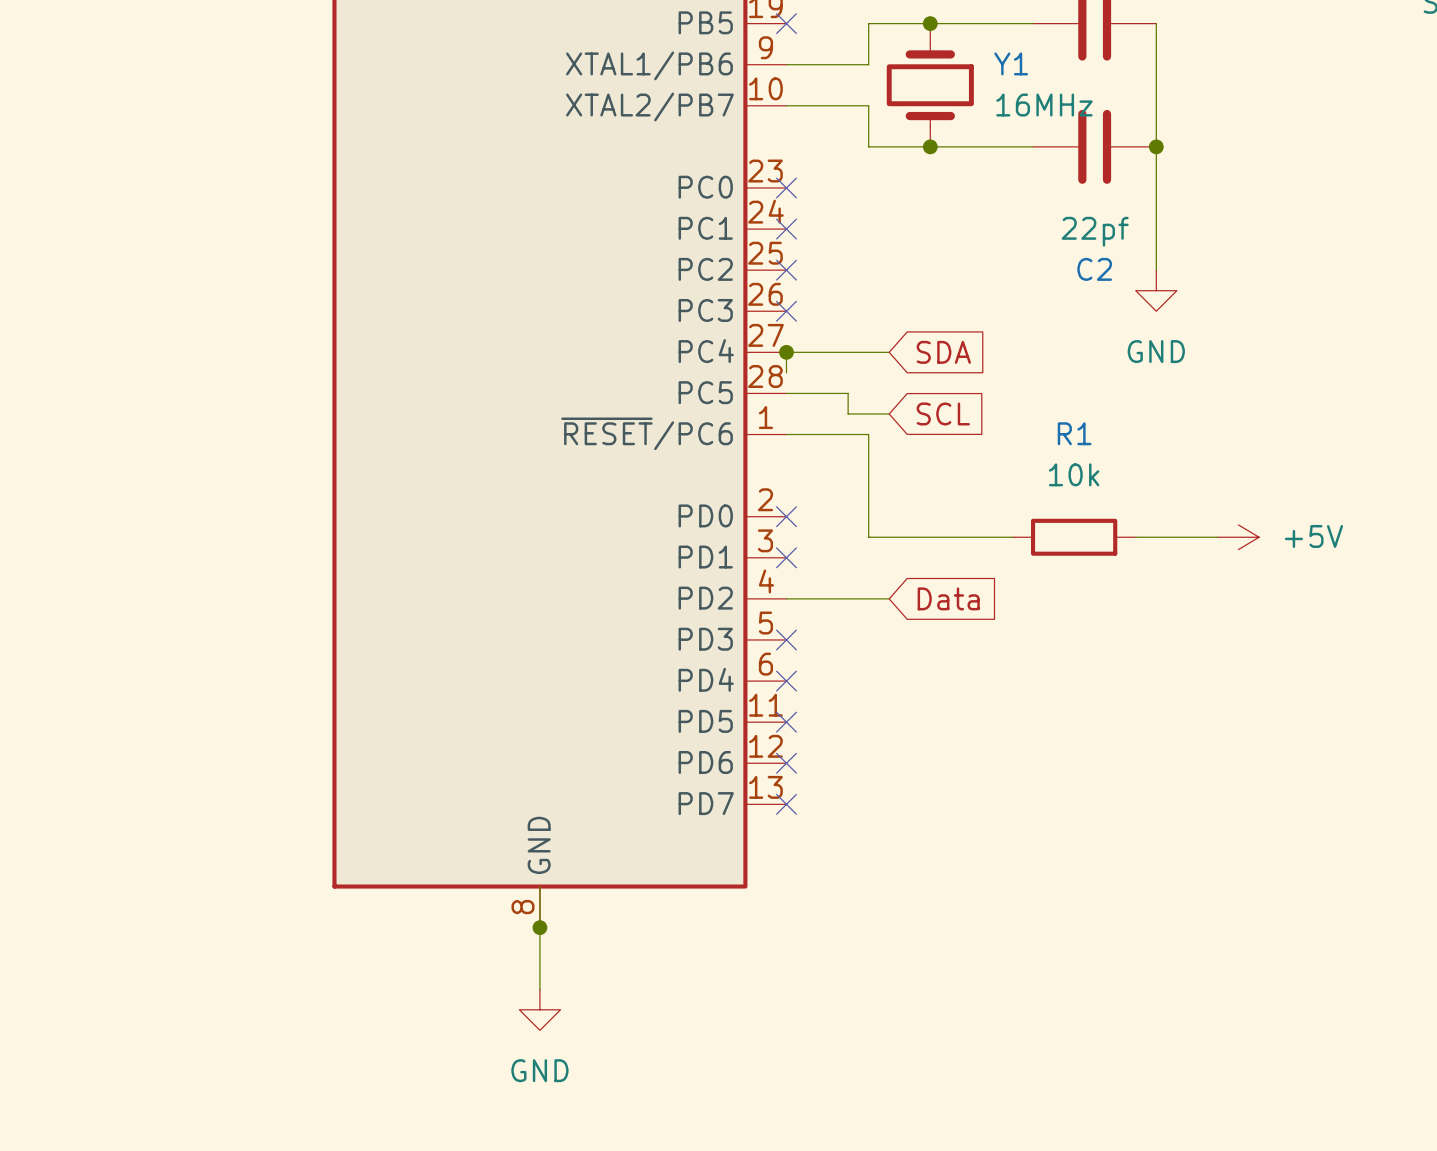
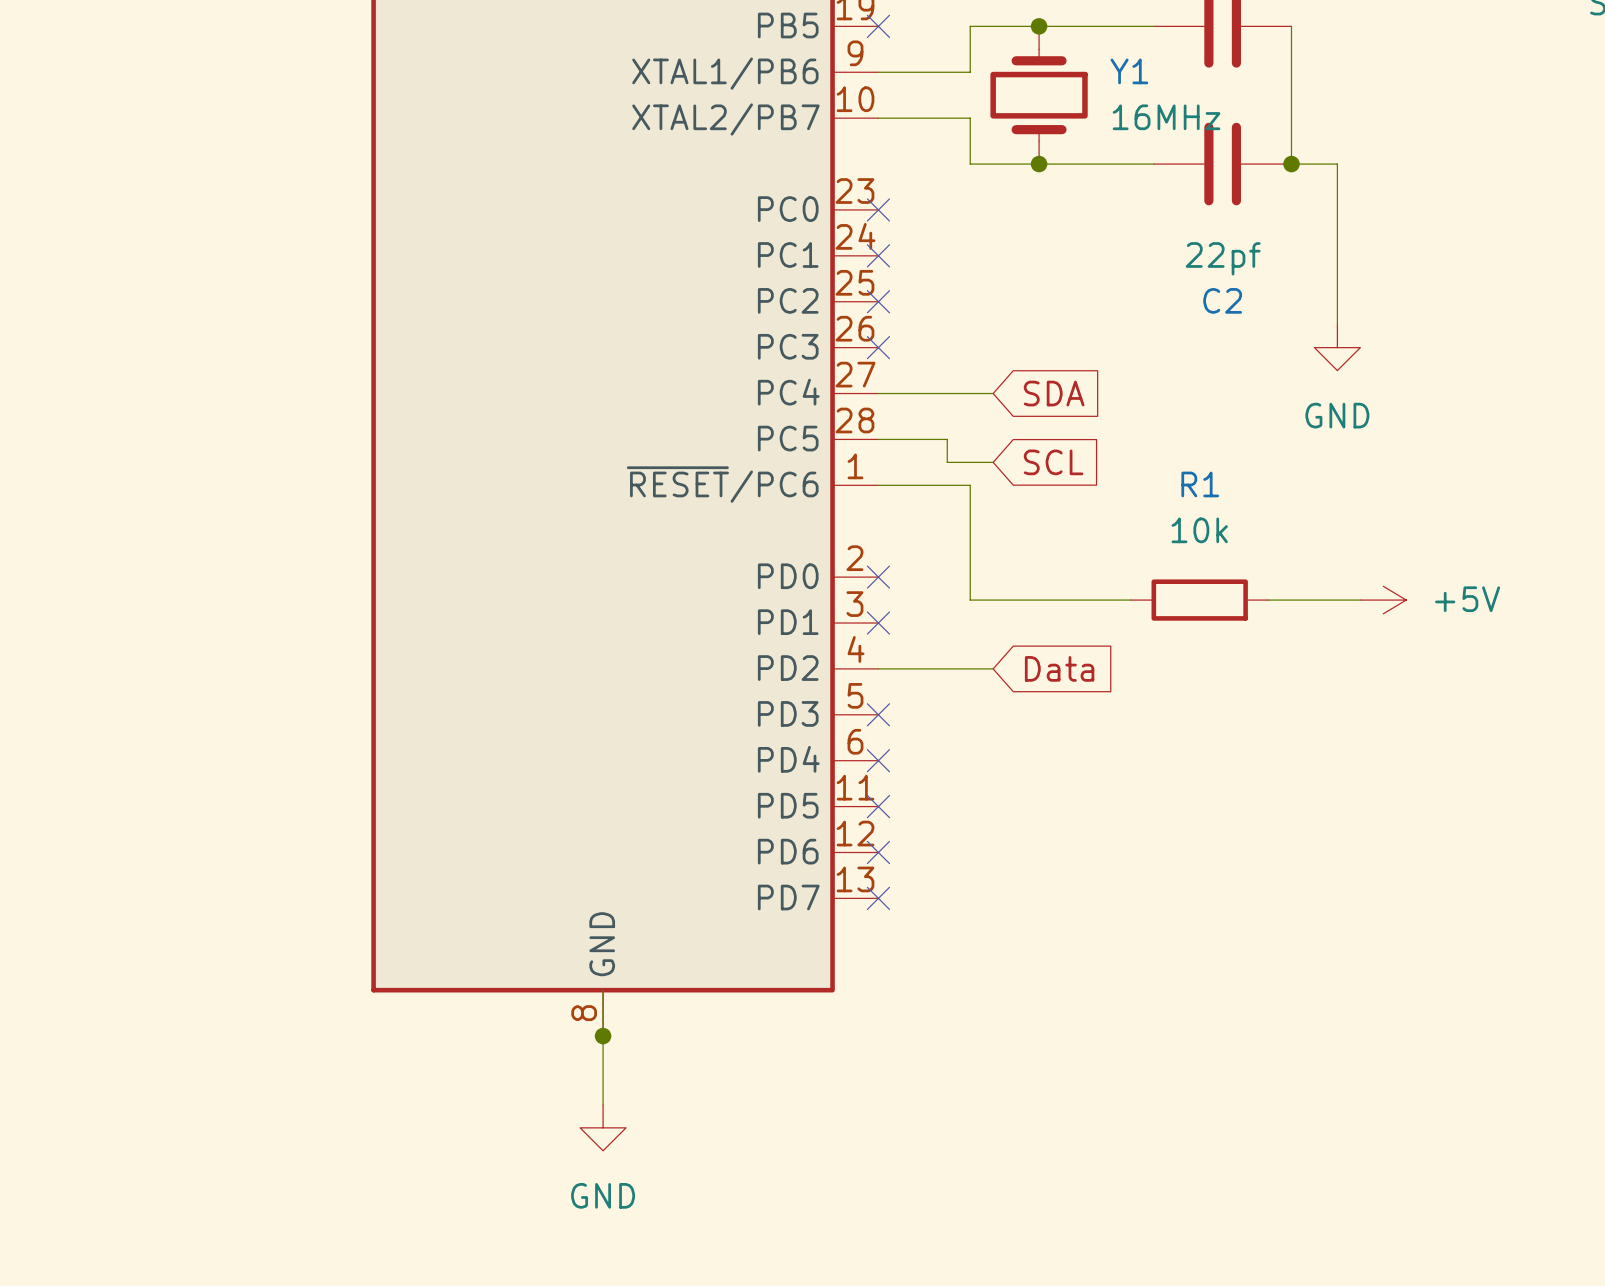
wire: (1156, 146) (1156, 270) -> (1291, 164) (1337, 164) (1337, 324)
power symbol position: GND (1156, 290) -> GND (1337, 347)
wire: (786, 352) (786, 372) -> none
junction: (786, 352) -> none

